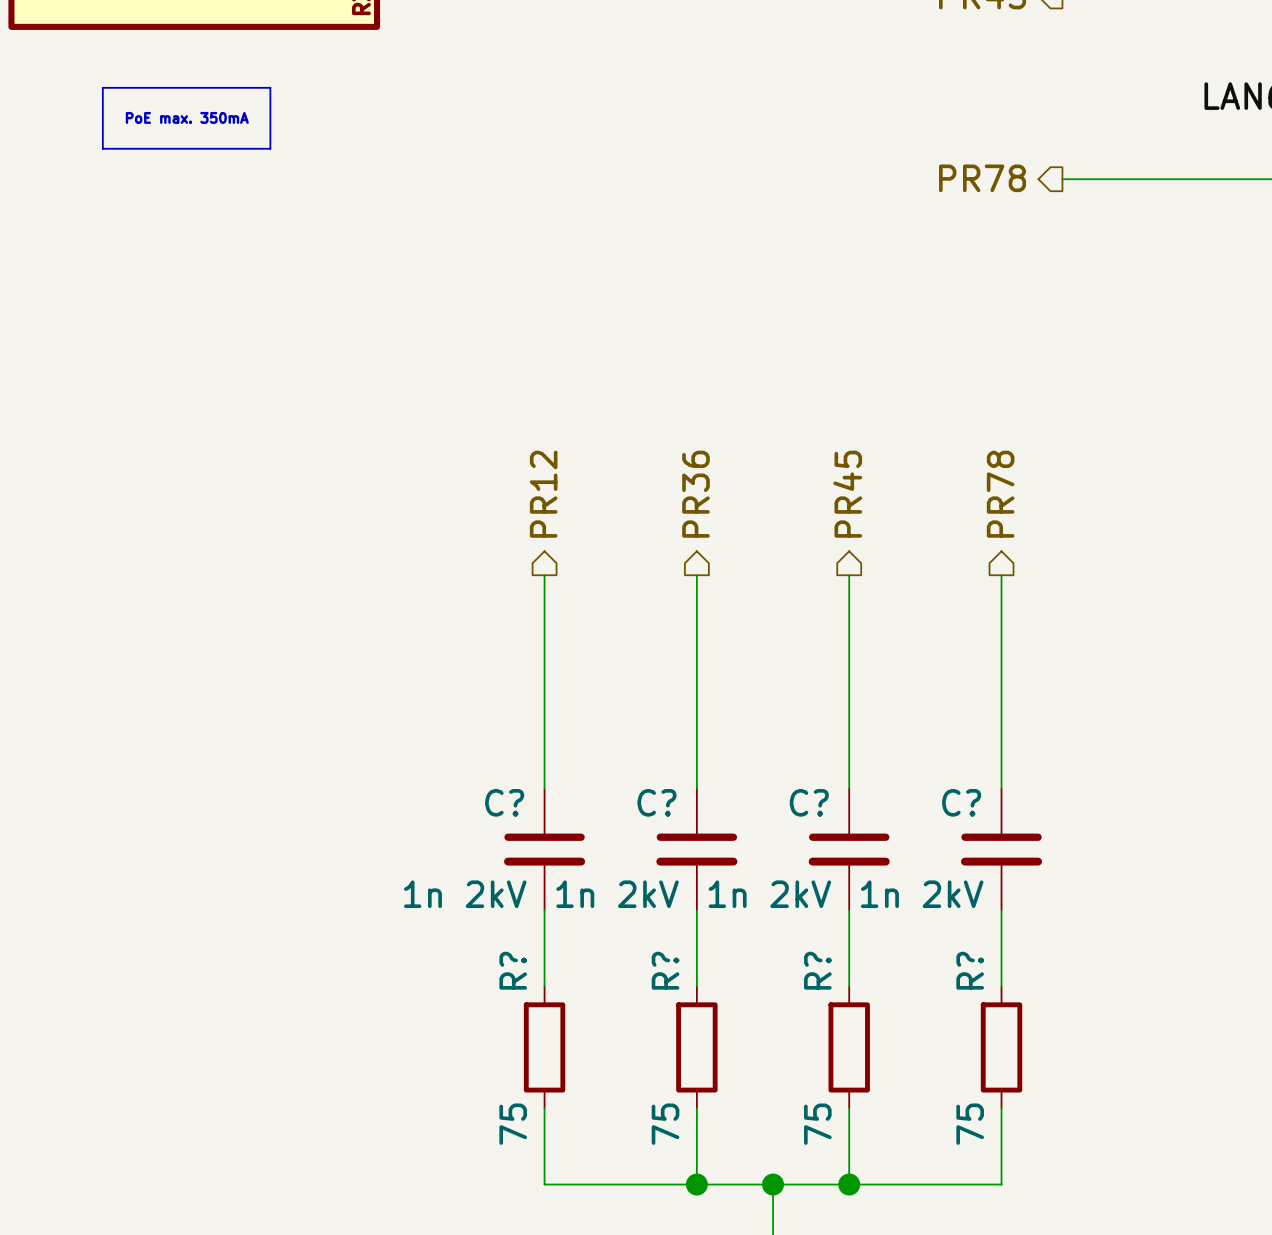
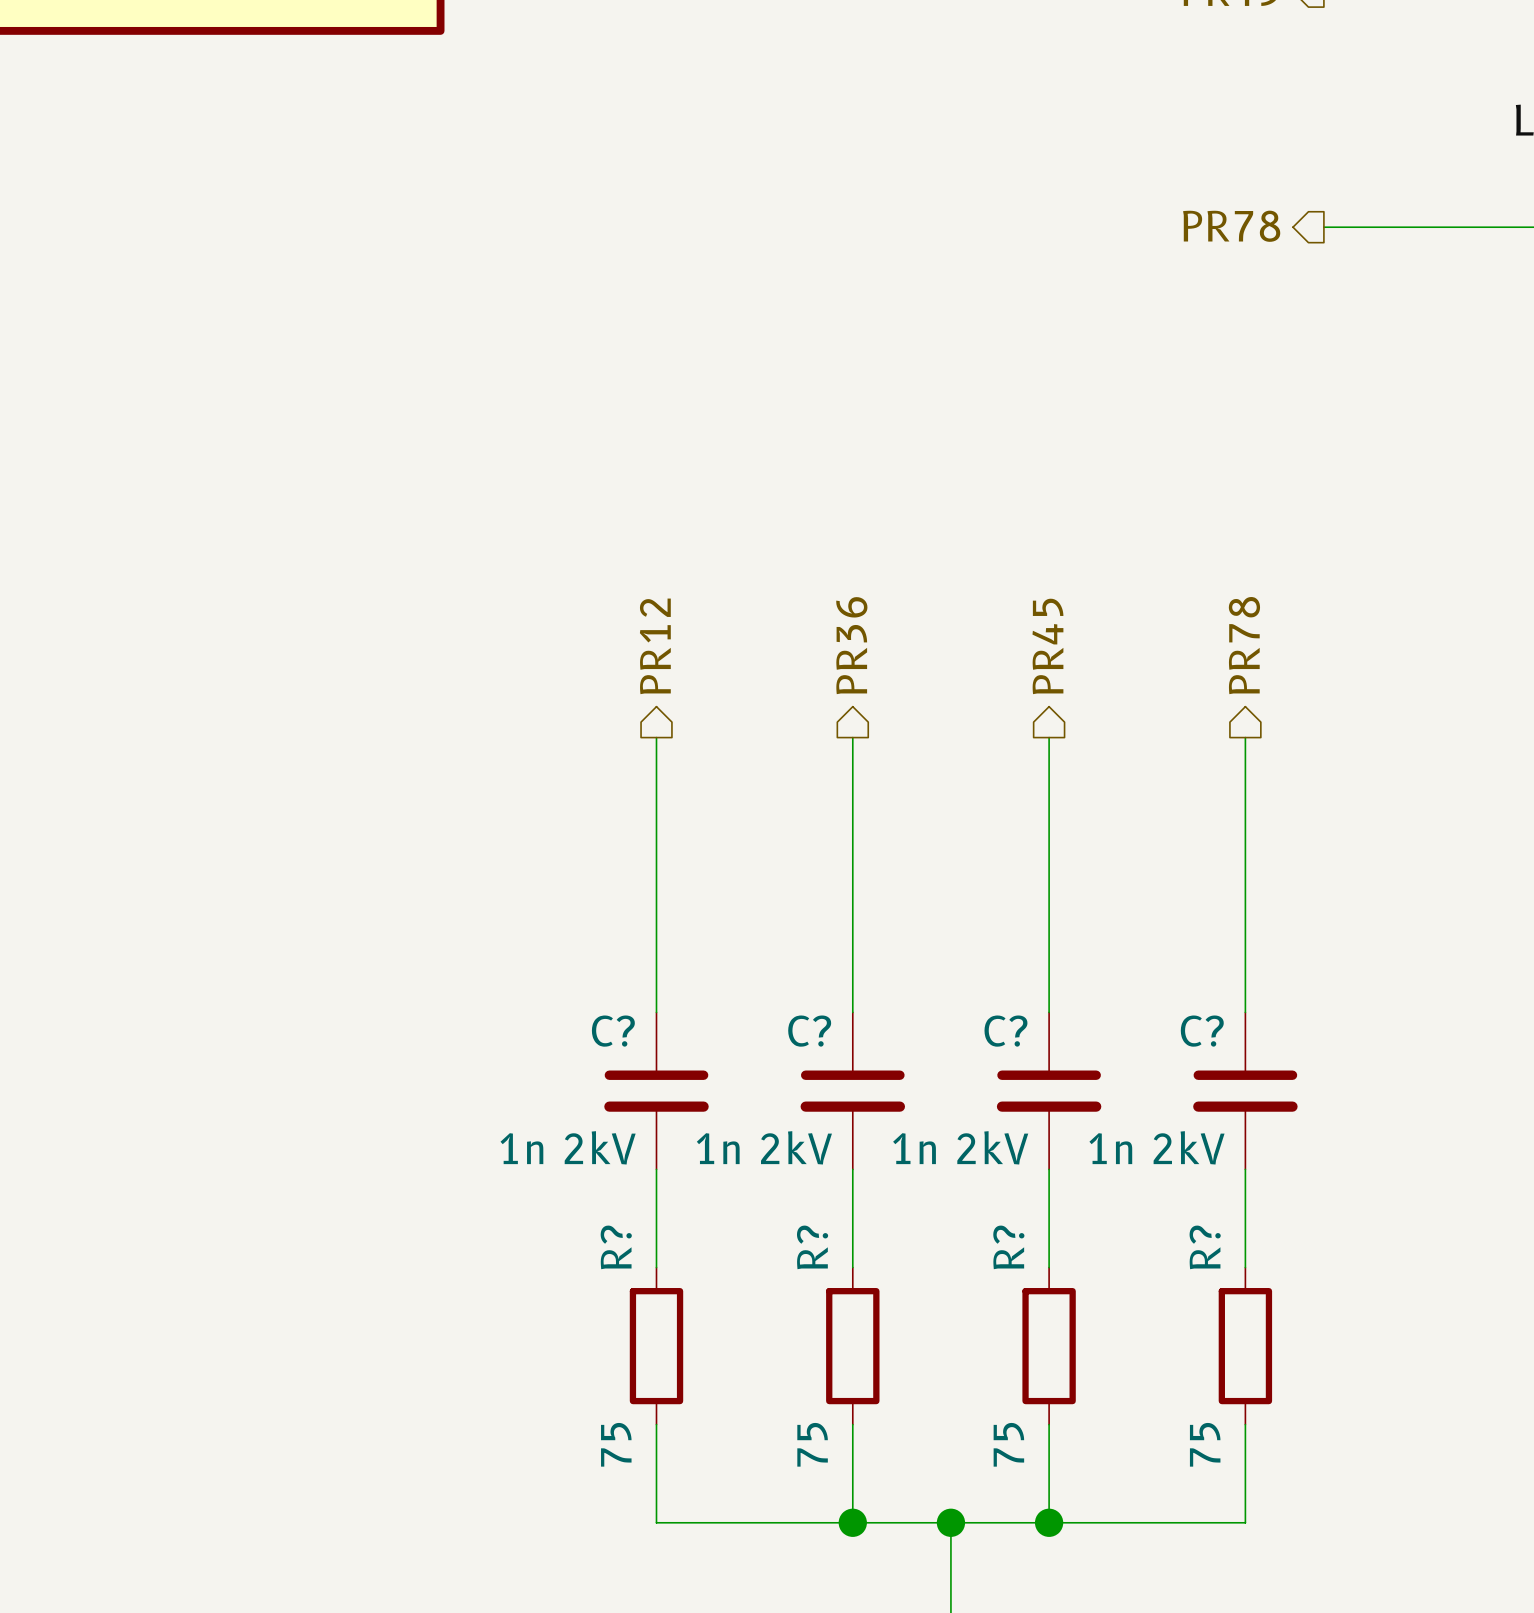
line: (102, 87) (270, 87) (270, 148) (102, 148) (102, 87) -> none
text: PoE max. 350mA (187, 117) -> none

